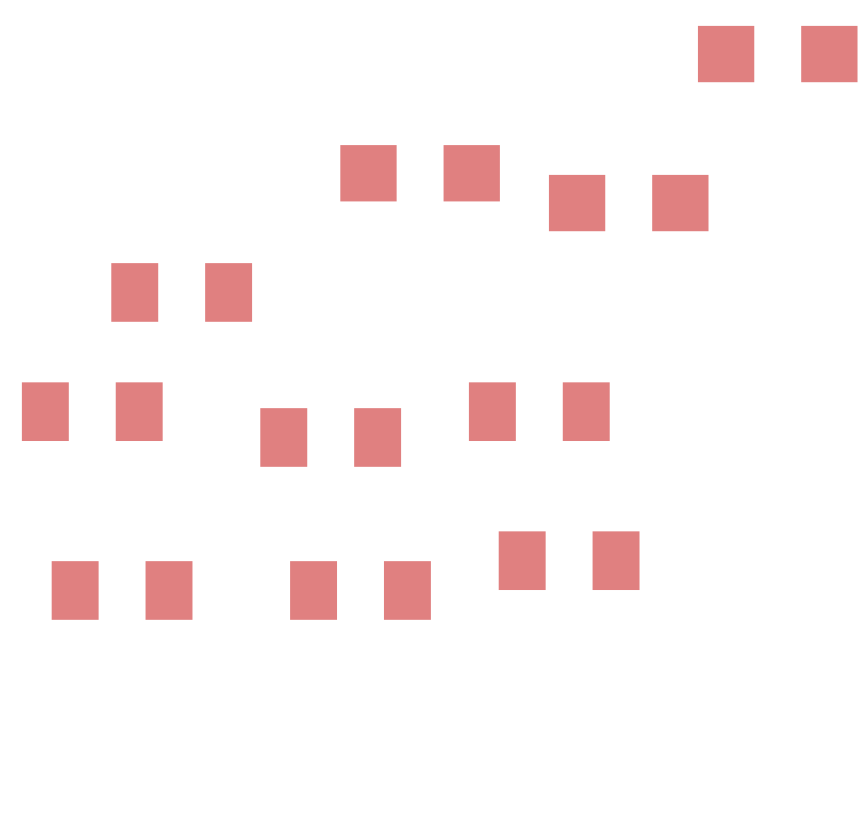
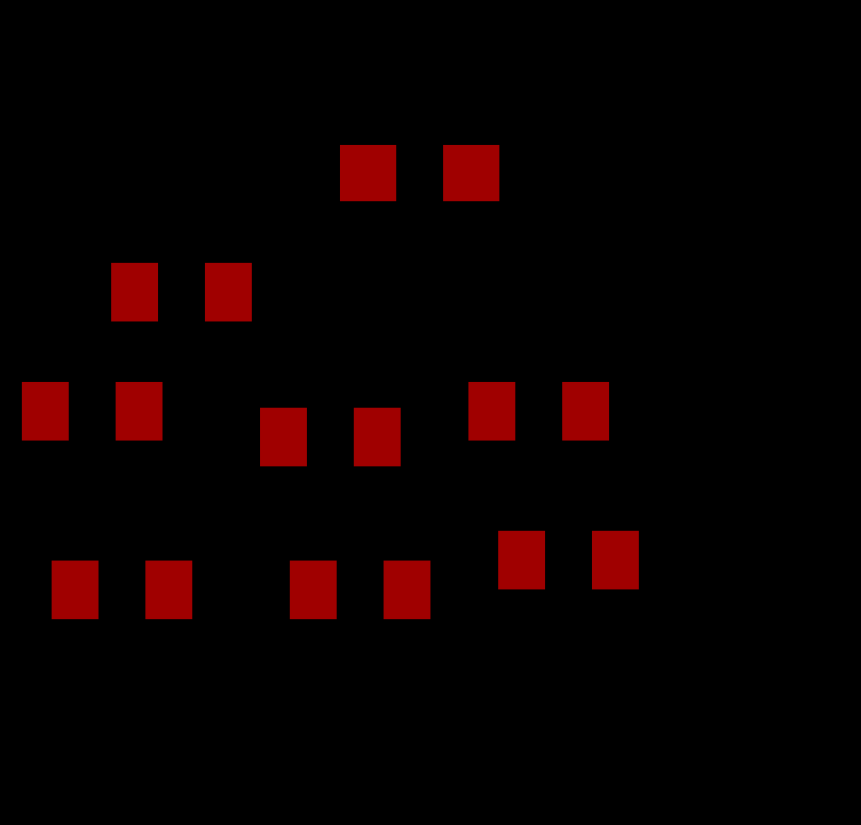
part: (777, 54) -> none
part: (628, 203) -> none

